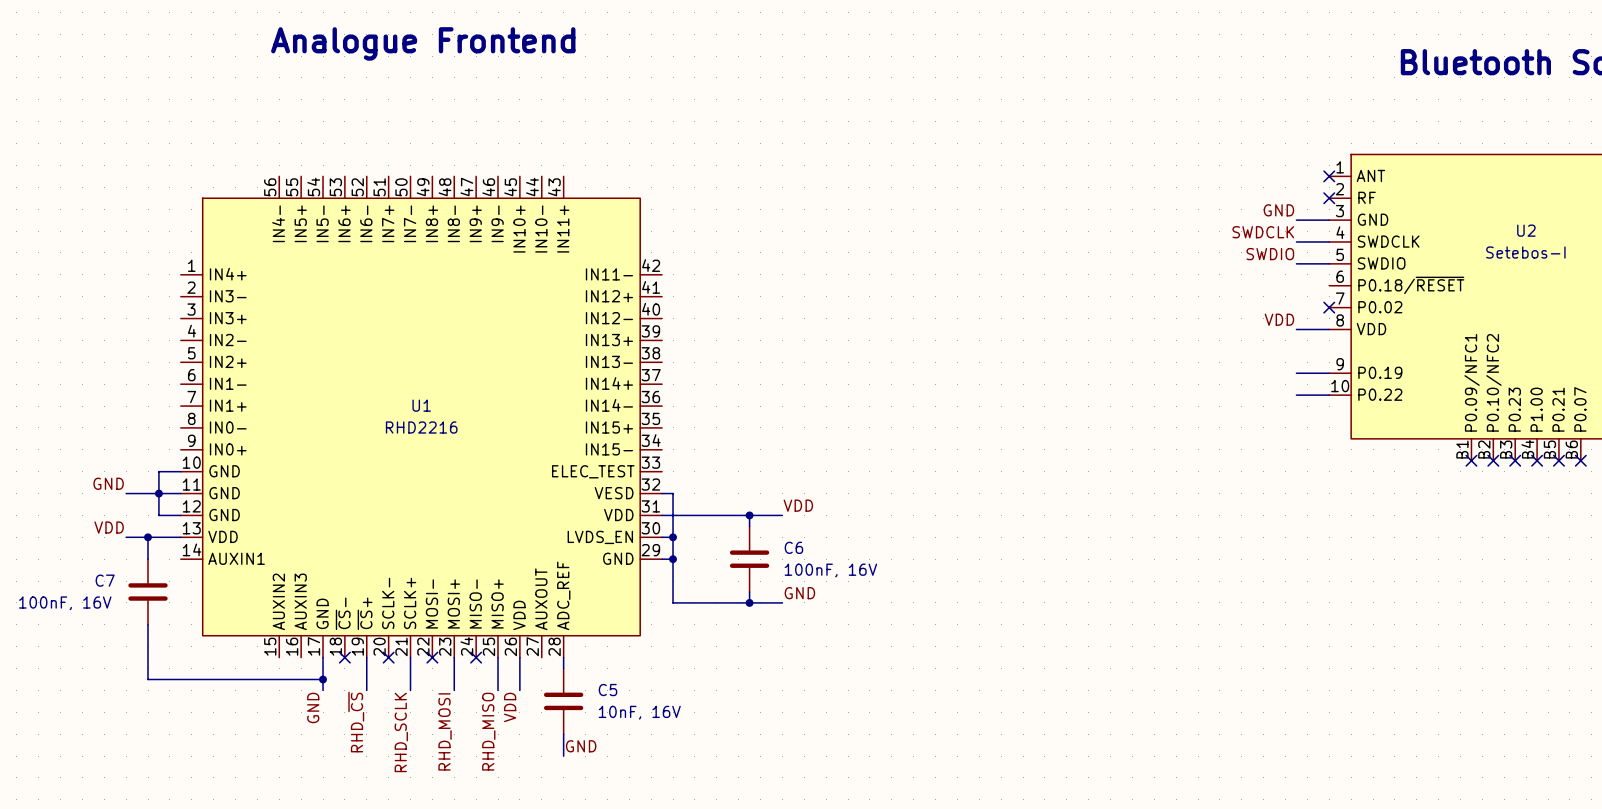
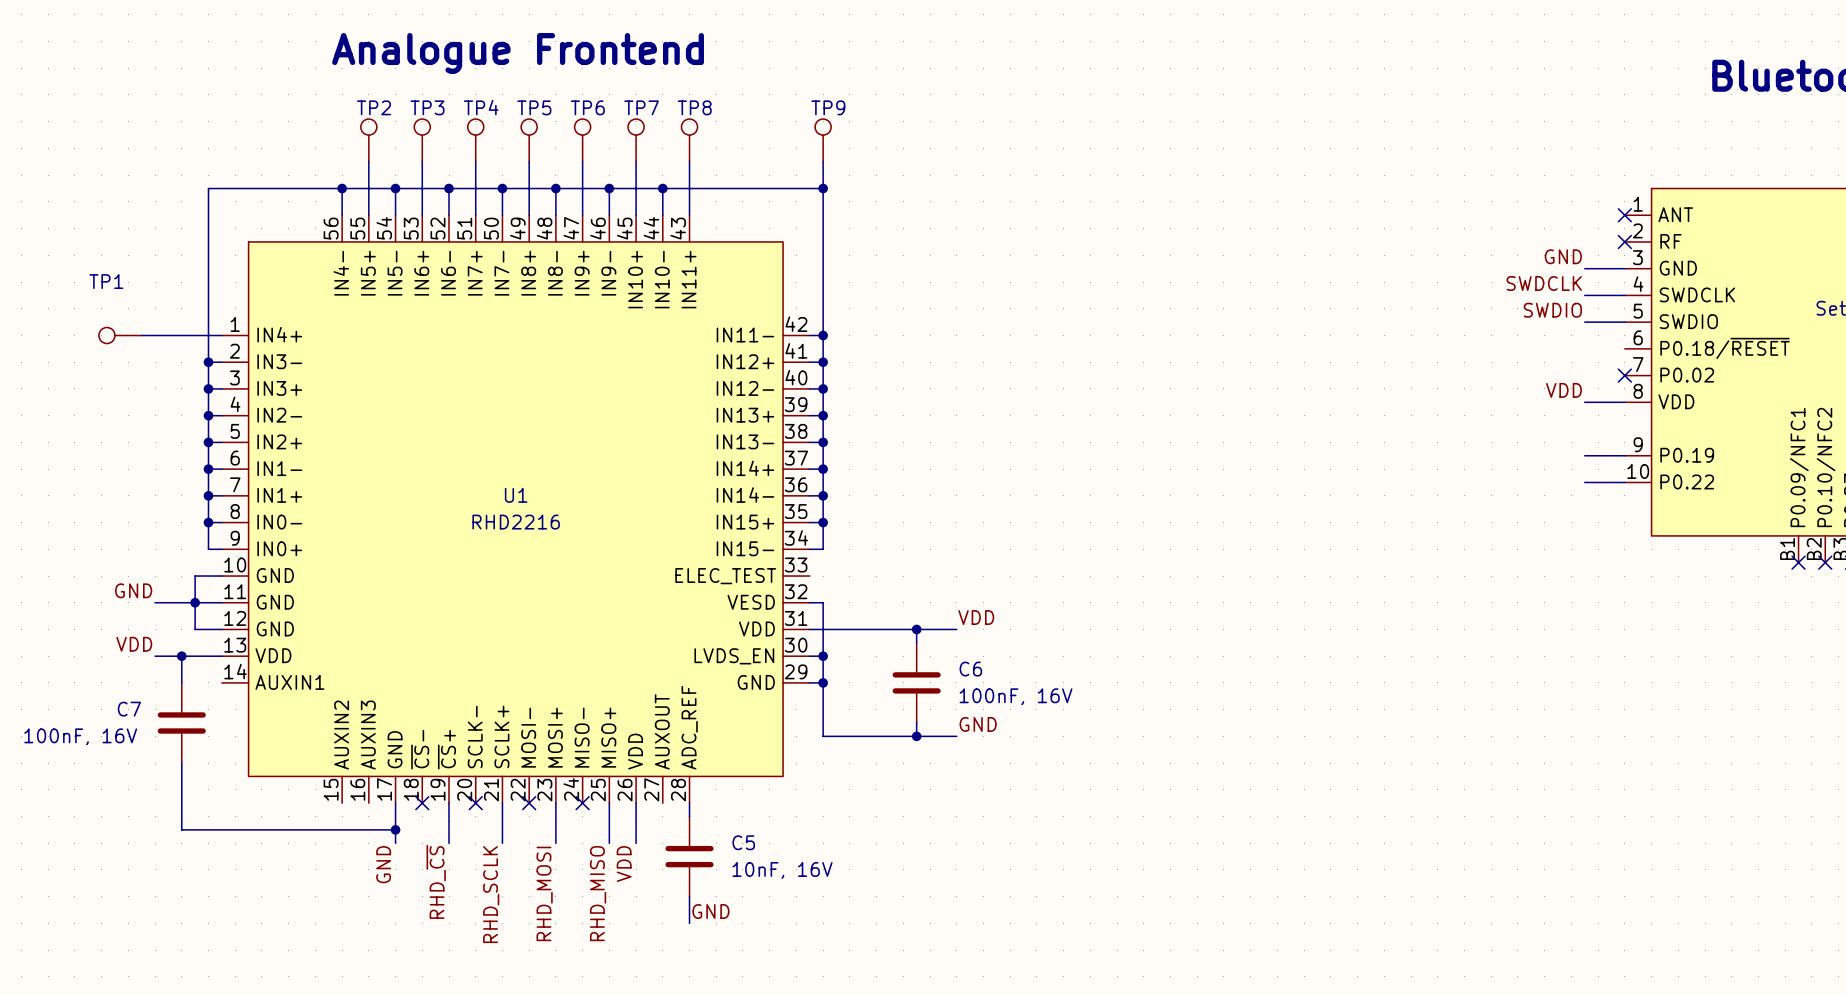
TP2: none -> (368, 140)
TP3: none -> (422, 140)
TP4: none -> (475, 140)
TP5: none -> (529, 140)
TP6: none -> (582, 140)
TP7: none -> (636, 140)
TP8: none -> (689, 140)
TP9: none -> (823, 140)
wire: none -> (368, 161) (368, 215)
wire: none -> (422, 161) (422, 215)
wire: none -> (475, 161) (475, 215)
wire: none -> (529, 161) (529, 215)
wire: none -> (582, 161) (582, 215)
wire: none -> (636, 161) (636, 215)
wire: none -> (689, 161) (689, 215)
wire: none -> (823, 161) (823, 549) (809, 549)
wire: none -> (342, 188) (342, 215)
junction: none -> (342, 188)
wire: none -> (395, 188) (395, 215)
junction: none -> (395, 188)
wire: none -> (449, 188) (449, 215)
junction: none -> (449, 188)
wire: none -> (502, 188) (502, 215)
junction: none -> (502, 188)
wire: none -> (555, 188) (555, 215)
junction: none -> (555, 188)
wire: none -> (609, 188) (609, 215)
junction: none -> (609, 188)
wire: none -> (662, 188) (662, 215)
junction: none -> (662, 188)
wire: none -> (823, 188) (208, 188) (208, 549) (221, 549)
junction: none -> (823, 188)
TP1: none -> (120, 335)
wire: none -> (141, 335) (221, 335)
wire: none -> (809, 335) (823, 335)
junction: none -> (823, 335)
wire: none -> (208, 362) (221, 362)
junction: none -> (208, 362)
wire: none -> (809, 362) (823, 362)
junction: none -> (823, 362)
wire: none -> (208, 388) (221, 388)
junction: none -> (208, 388)
wire: none -> (809, 388) (823, 388)
junction: none -> (823, 388)
wire: none -> (208, 415) (221, 415)
junction: none -> (208, 415)
wire: none -> (809, 415) (823, 415)
junction: none -> (823, 415)
wire: none -> (208, 442) (221, 442)
junction: none -> (208, 442)
wire: none -> (809, 442) (823, 442)
junction: none -> (823, 442)
wire: none -> (208, 469) (221, 469)
junction: none -> (208, 469)
wire: none -> (809, 469) (823, 469)
junction: none -> (823, 469)
wire: none -> (208, 495) (221, 495)
junction: none -> (208, 495)
wire: none -> (809, 495) (823, 495)
junction: none -> (823, 495)
wire: none -> (208, 522) (221, 522)
junction: none -> (208, 522)
wire: none -> (809, 522) (823, 522)
junction: none -> (823, 522)

